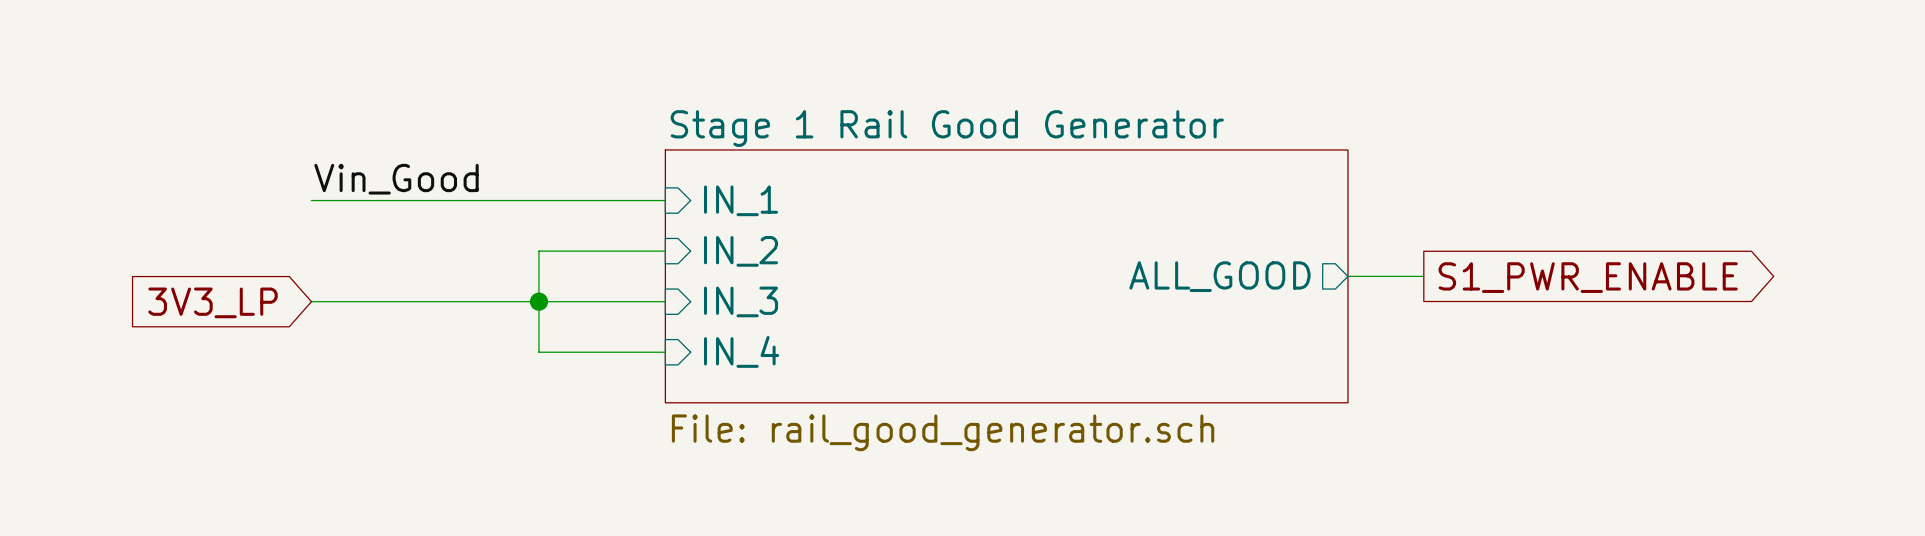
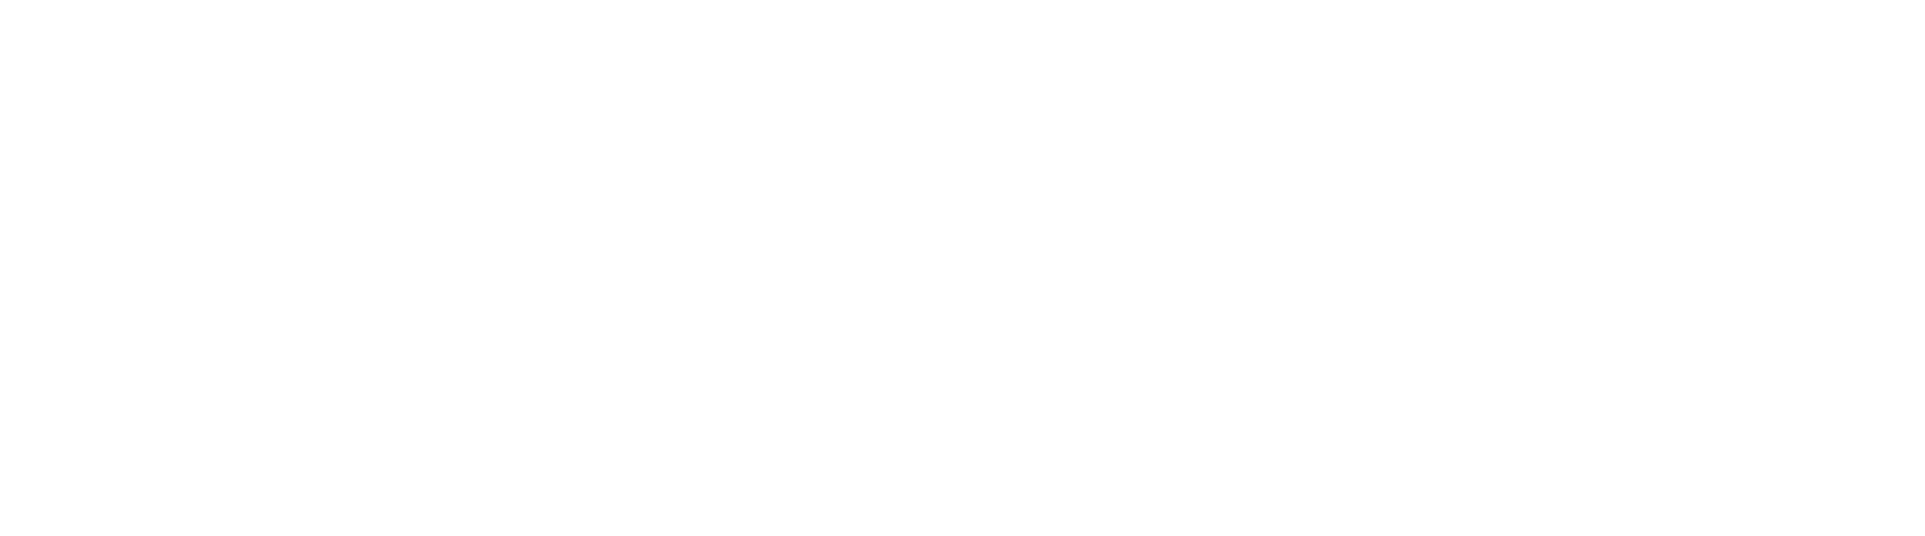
label: Vin_Good (396, 179) -> none
wire: (311, 200) (665, 200) -> none
sheet pin: IN_1 (741, 200) -> none
wire: (665, 251) (538, 251) (538, 352) (665, 352) -> none
sheet pin: IN_2 (741, 251) -> none
sheet Stage 1 Rail Good Generator: File: rail_good_generator.sch (1006, 276) -> none
sheet pin: ALL_GOOD (1219, 276) -> none
wire: (1347, 276) (1423, 276) -> none
global label: S1_PWR_ENABLE (1588, 277) -> none
wire: (311, 301) (665, 301) -> none
junction: (538, 301) -> none
sheet pin: IN_3 (741, 301) -> none
global label: 3V3_LP (212, 302) -> none
sheet pin: IN_4 (741, 351) -> none

